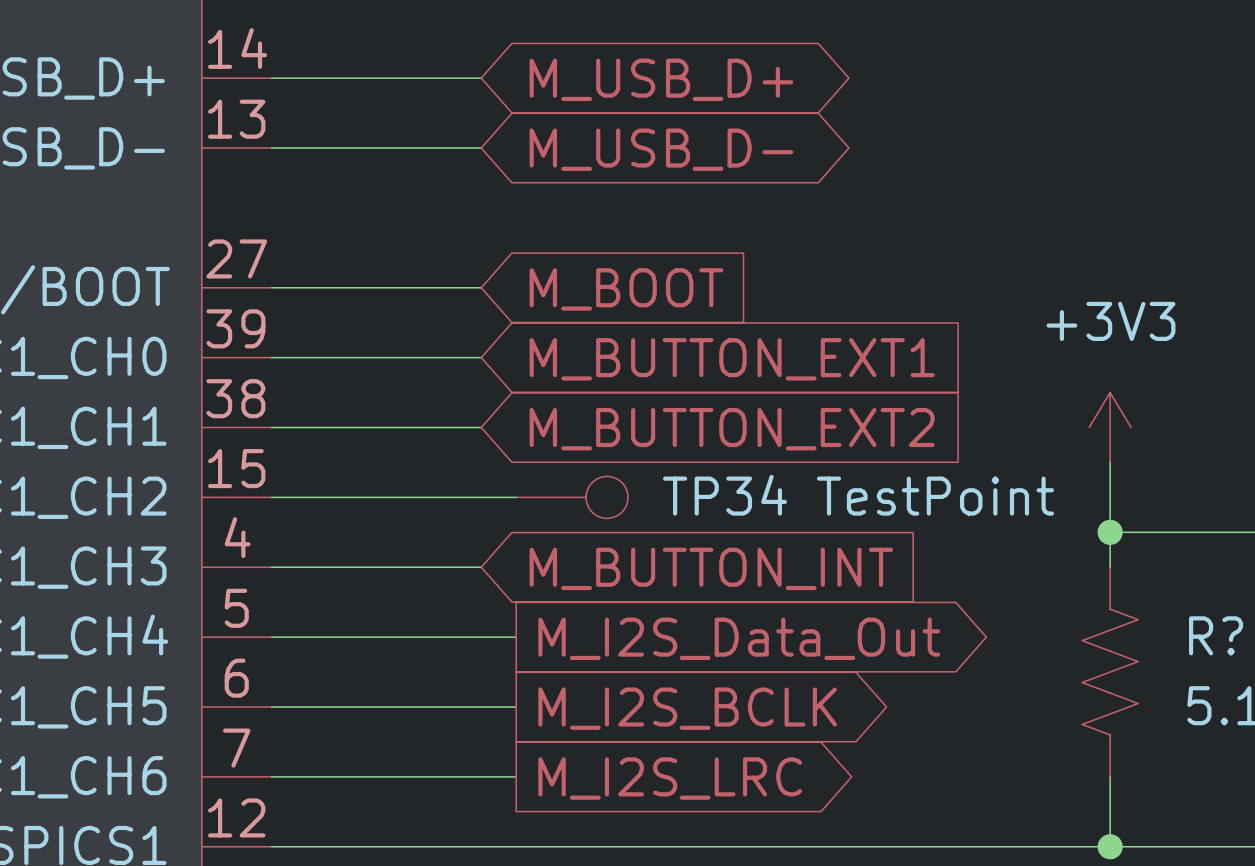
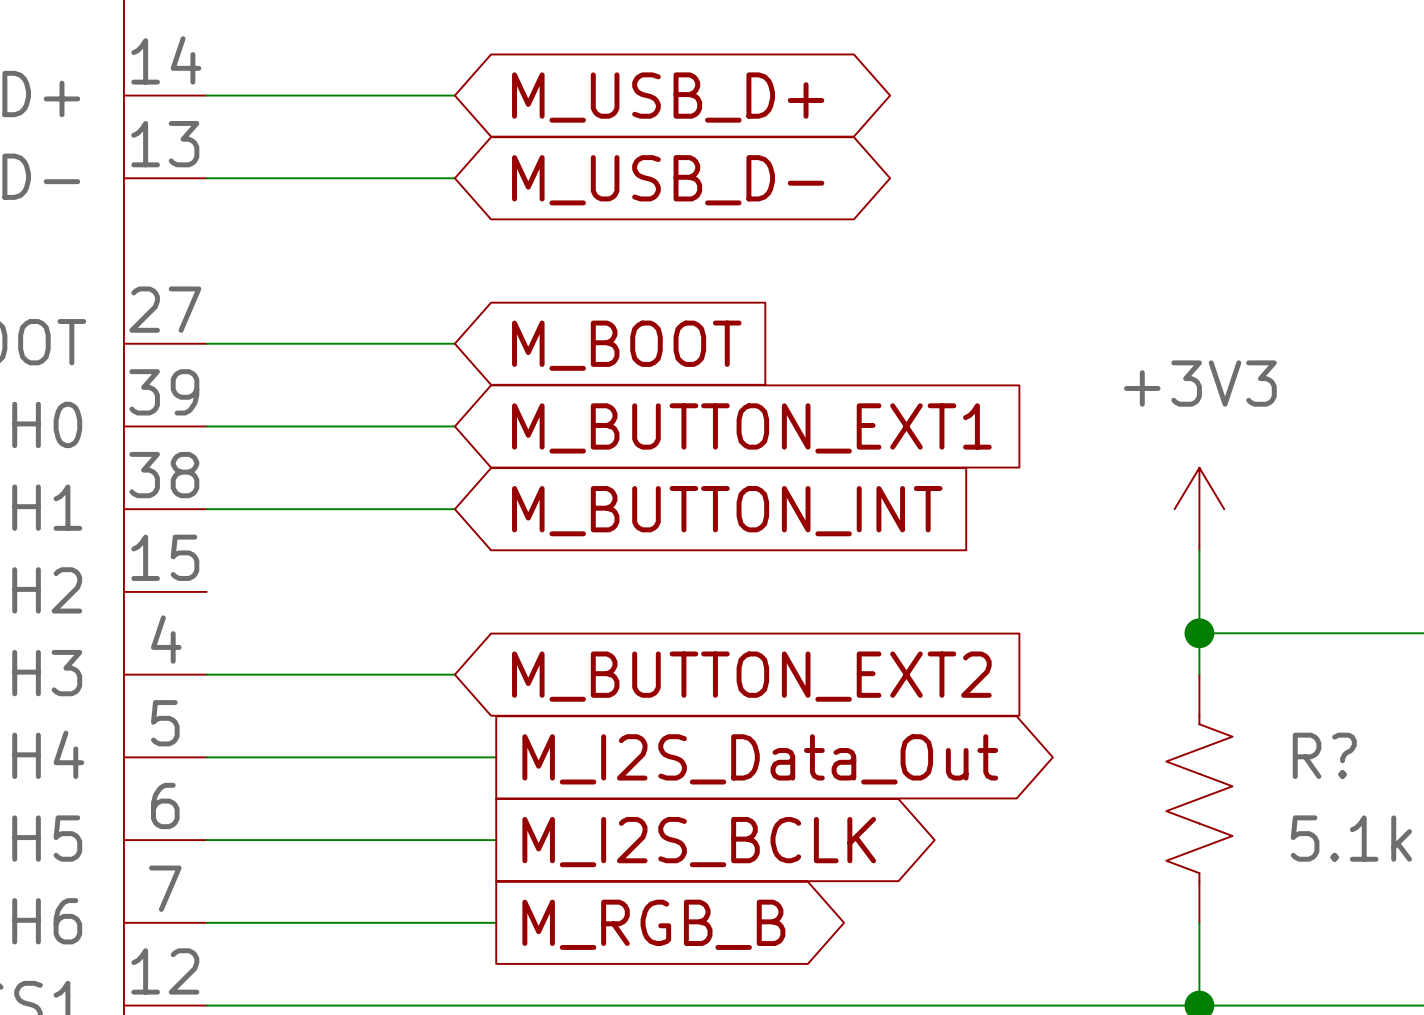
global label: M_BUTTON_EXT2 (732, 429) -> M_BUTTON_INT (727, 511)
wire: (271, 497) (516, 497) -> none
TP34: TestPoint (572, 497) -> none
global label: M_BUTTON_INT (711, 568) -> M_BUTTON_EXT2 (751, 676)
global label: M_I2S_LRC (670, 778) -> M_RGB_B (653, 924)

